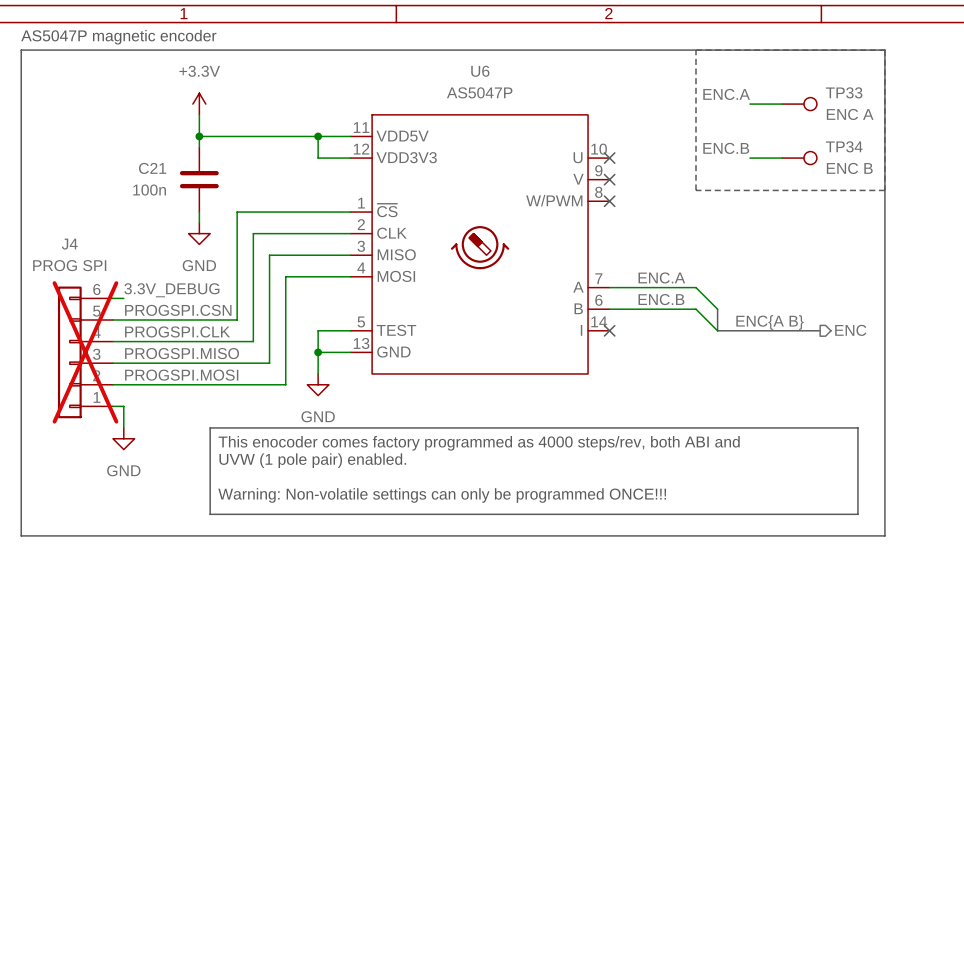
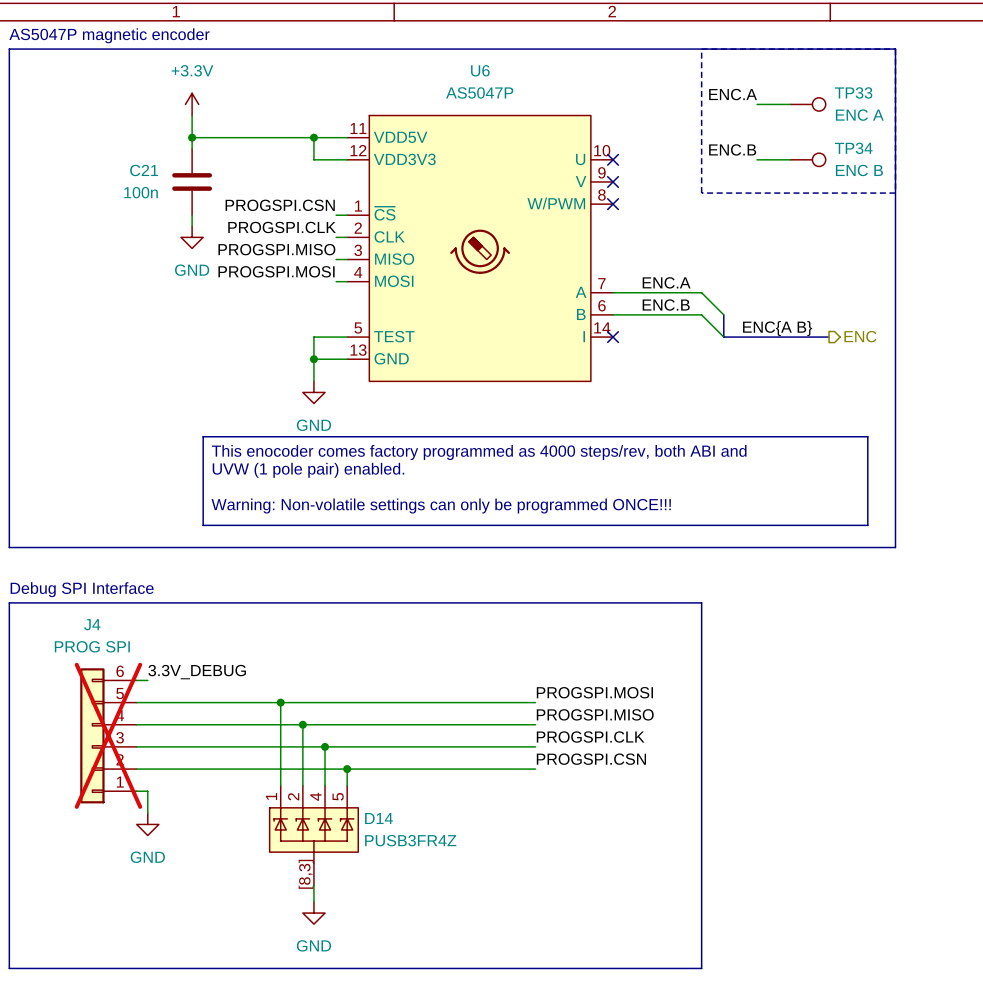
label: none -> PROGSPI.CSN (280, 205)
wire: (339, 212) (237, 212) (237, 320) (112, 320) -> none
label: none -> PROGSPI.CLK (282, 227)
wire: (339, 233) (253, 233) (253, 341) (112, 341) -> none
label: none -> PROGSPI.MISO (276, 249)
wire: (339, 255) (269, 255) (269, 363) (112, 363) -> none
label: none -> PROGSPI.MOSI (276, 271)
wire: (339, 276) (285, 276) (285, 384) (112, 384) -> none
label: 3.3V_DEBUG (171, 290) -> none
wire: (112, 298) (123, 298) -> none
label: PROGSPI.CSN (178, 310) -> none
label: PROGSPI.CLK (177, 331) -> none
J4 position: (85, 352) -> (108, 735)
label: PROGSPI.MISO (182, 353) -> none
label: PROGSPI.MOSI (181, 375) -> none
wire: (112, 406) (123, 406) (123, 427) -> none
power symbol: GND (123, 438) -> none
text: none -> Debug SPI Interface (82, 589)
line: none -> (9, 602) (701, 602) (701, 968) (9, 968) (9, 602)
label: none -> 3.3V_DEBUG (197, 672)
wire: none -> (136, 680) (147, 680)
label: none -> PROGSPI.MOSI (594, 692)
wire: none -> (136, 702) (535, 702)
wire: none -> (280, 702) (280, 785)
junction: none -> (280, 702)
label: none -> PROGSPI.MISO (595, 714)
wire: none -> (136, 724) (535, 724)
wire: none -> (302, 724) (302, 785)
junction: none -> (302, 724)
label: none -> PROGSPI.CLK (590, 737)
wire: none -> (136, 746) (535, 746)
wire: none -> (325, 746) (325, 785)
junction: none -> (325, 746)
label: none -> PROGSPI.CSN (591, 759)
wire: none -> (136, 769) (535, 769)
wire: none -> (347, 769) (347, 785)
junction: none -> (347, 769)
wire: none -> (136, 791) (147, 791) (147, 813)
power symbol: none -> GND (147, 824)
D14: none -> PUSB3FR4Z (313, 835)
wire: none -> (313, 885) (313, 901)
power symbol: none -> GND (313, 913)

